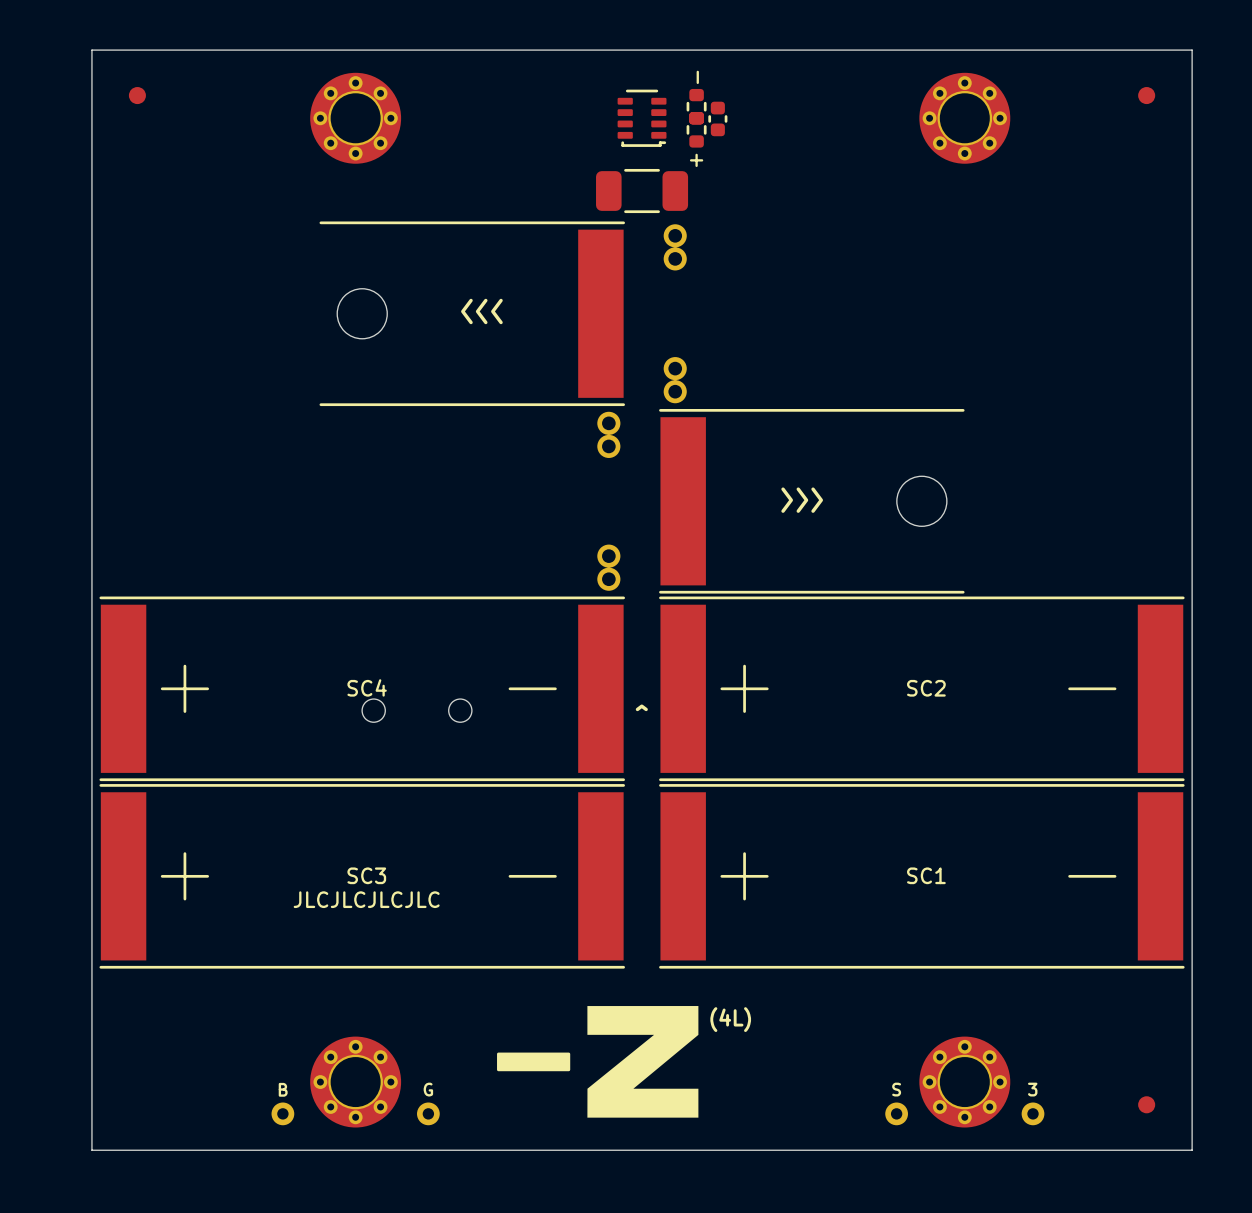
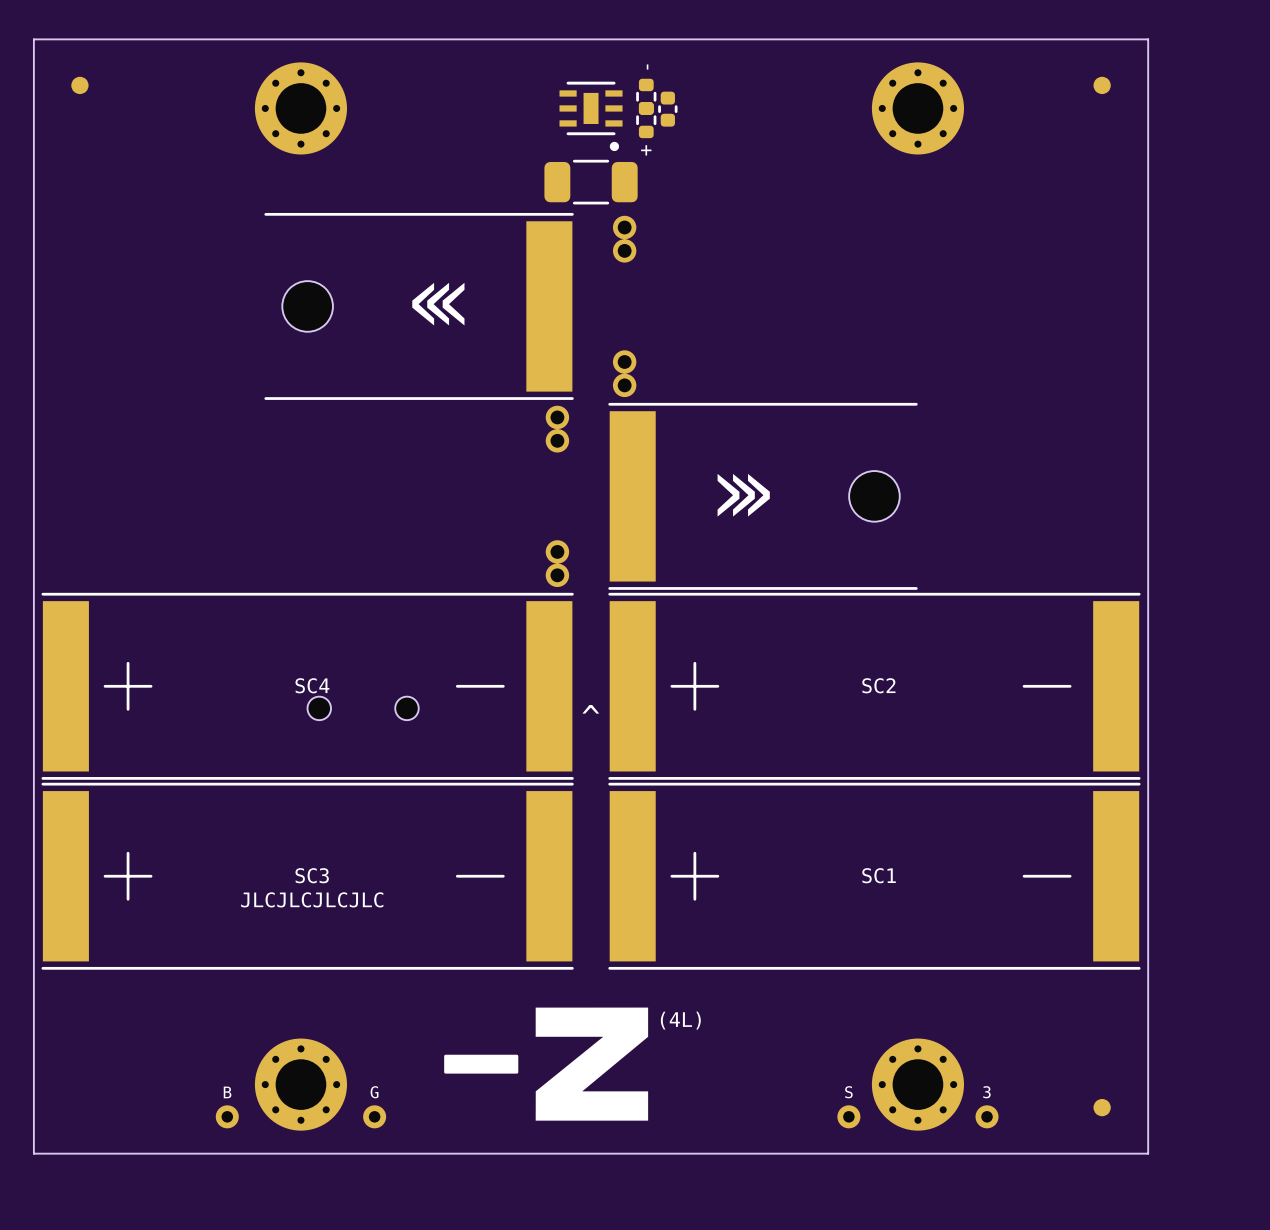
part footprint: [617, 89, 667, 147] -> [559, 81, 623, 152]

